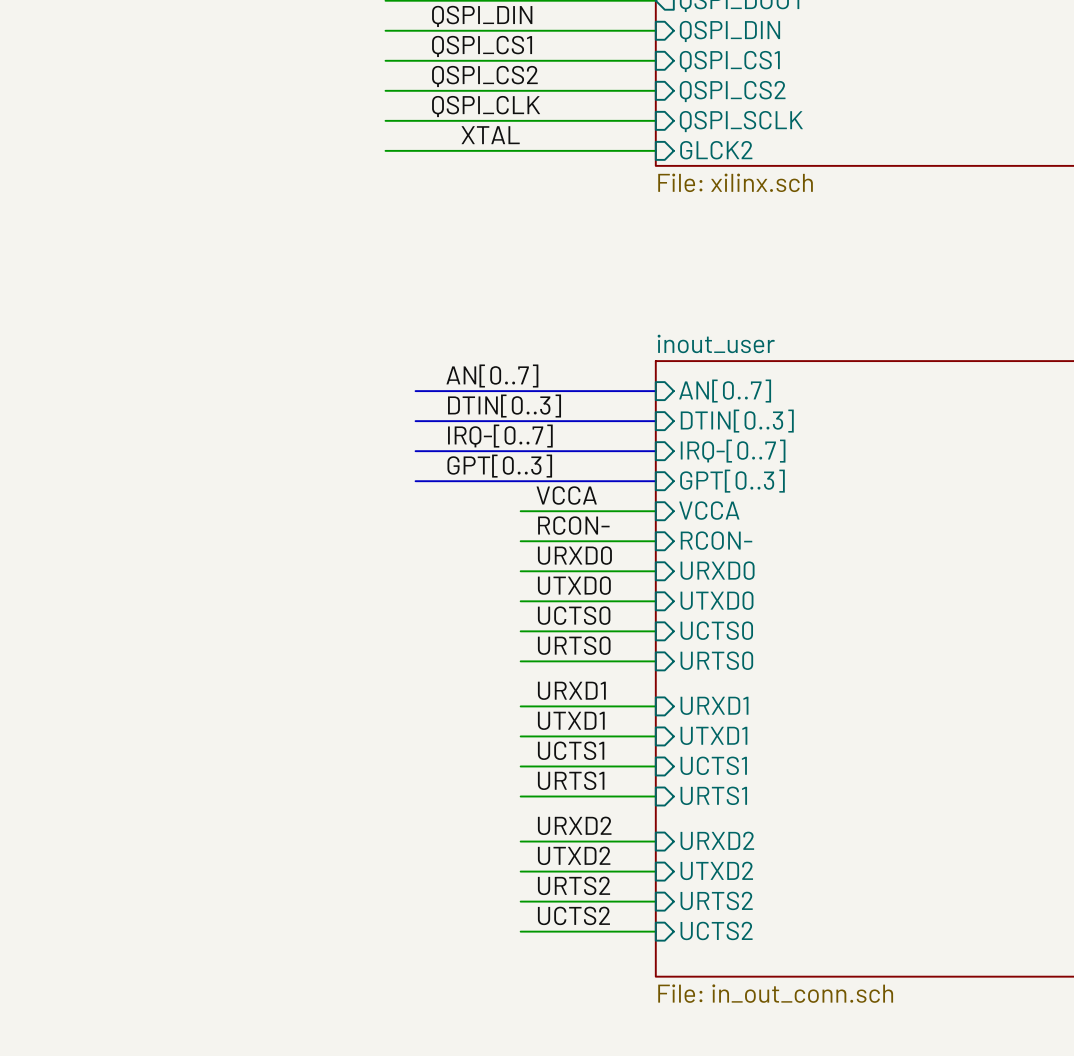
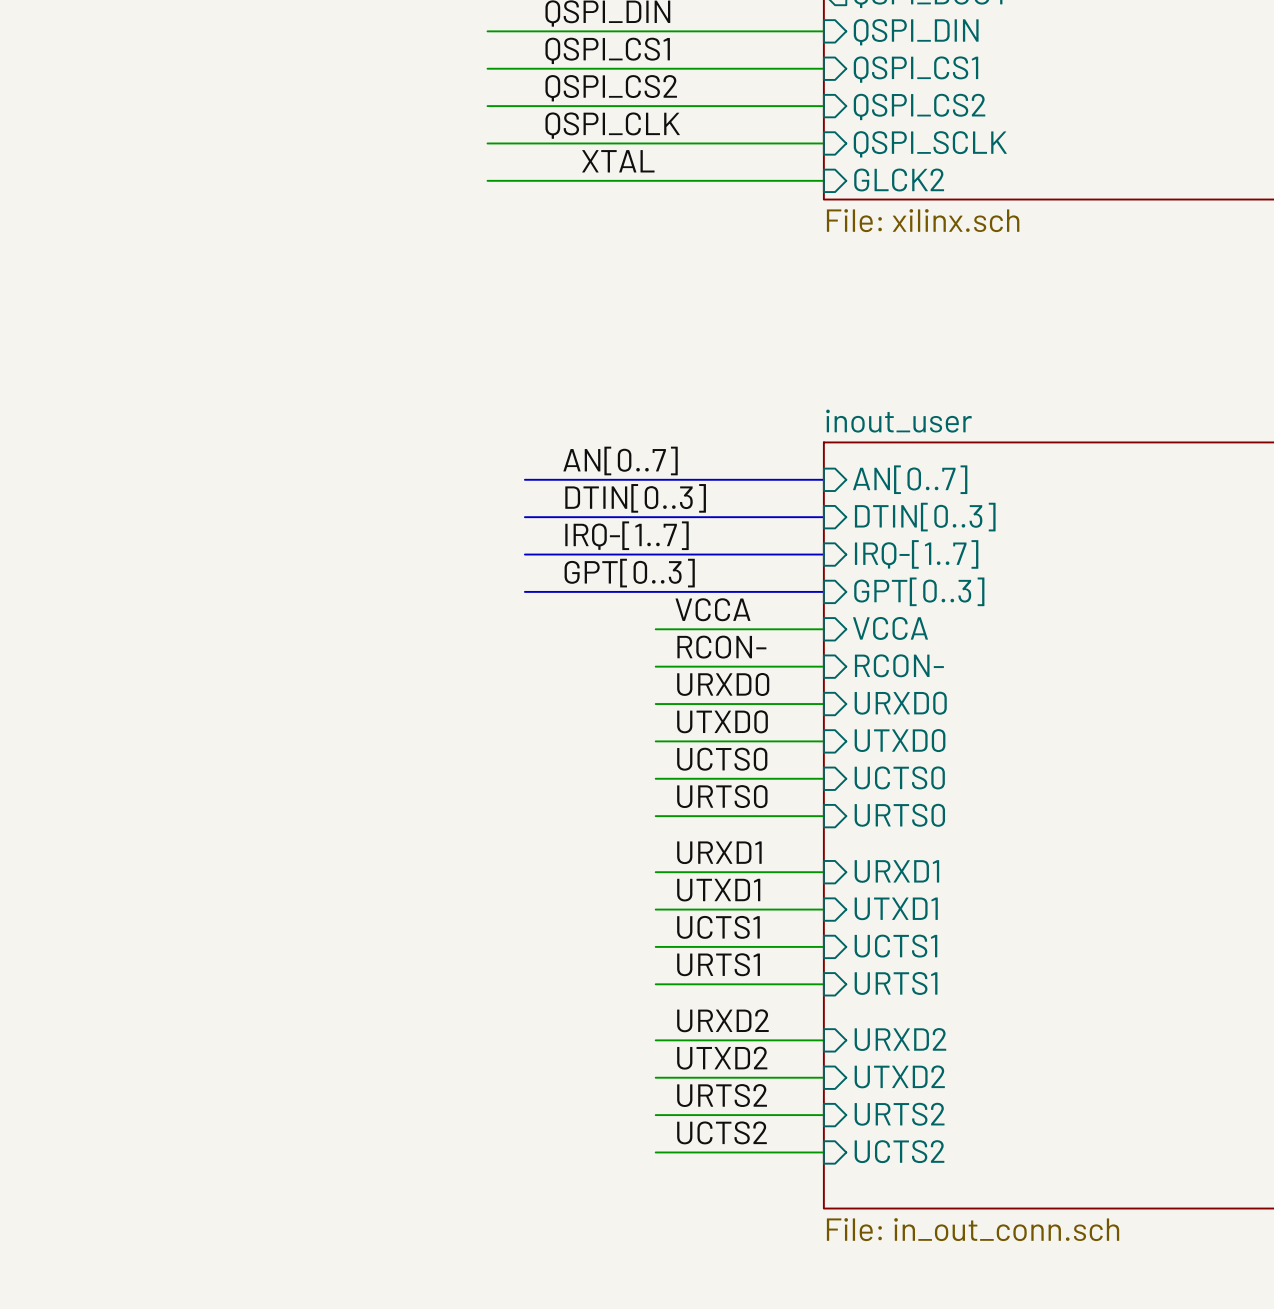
label: IRQ-[0..7] (500, 436) -> IRQ-[1..7] (627, 535)
sheet pin: IRQ-[0..7] (733, 451) -> IRQ-[1..7] (916, 554)

